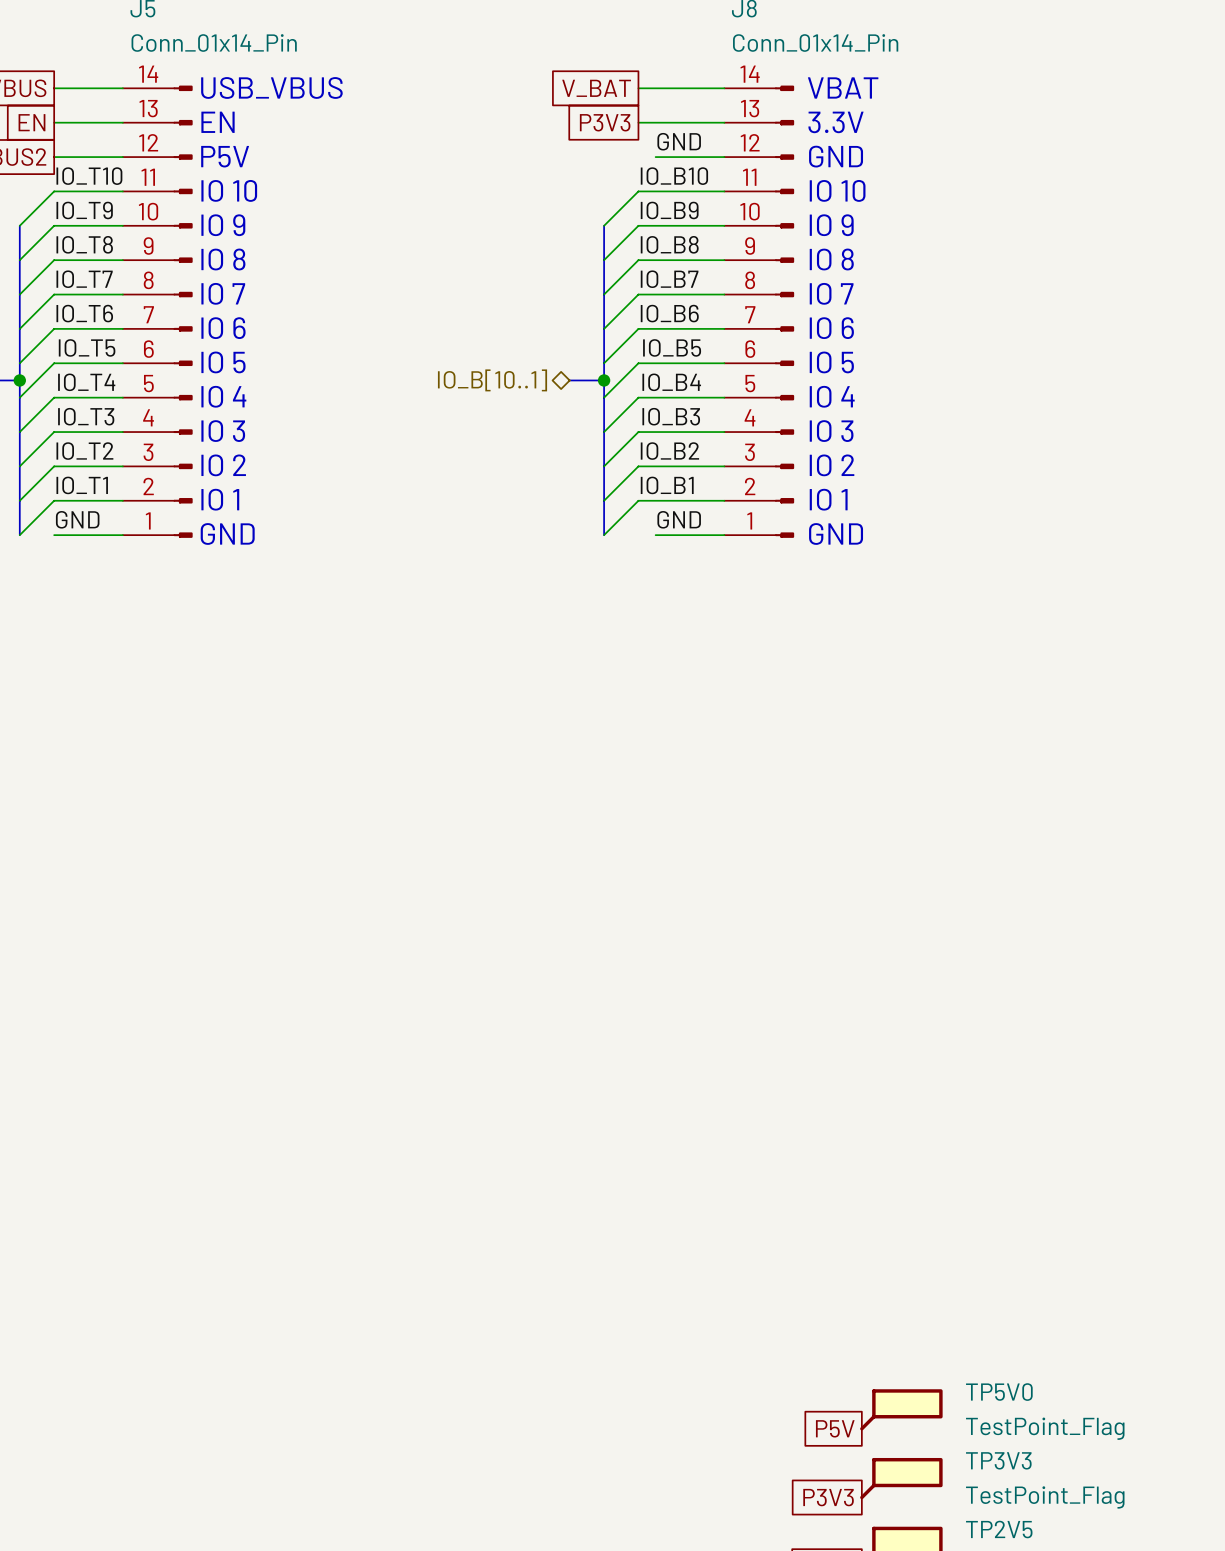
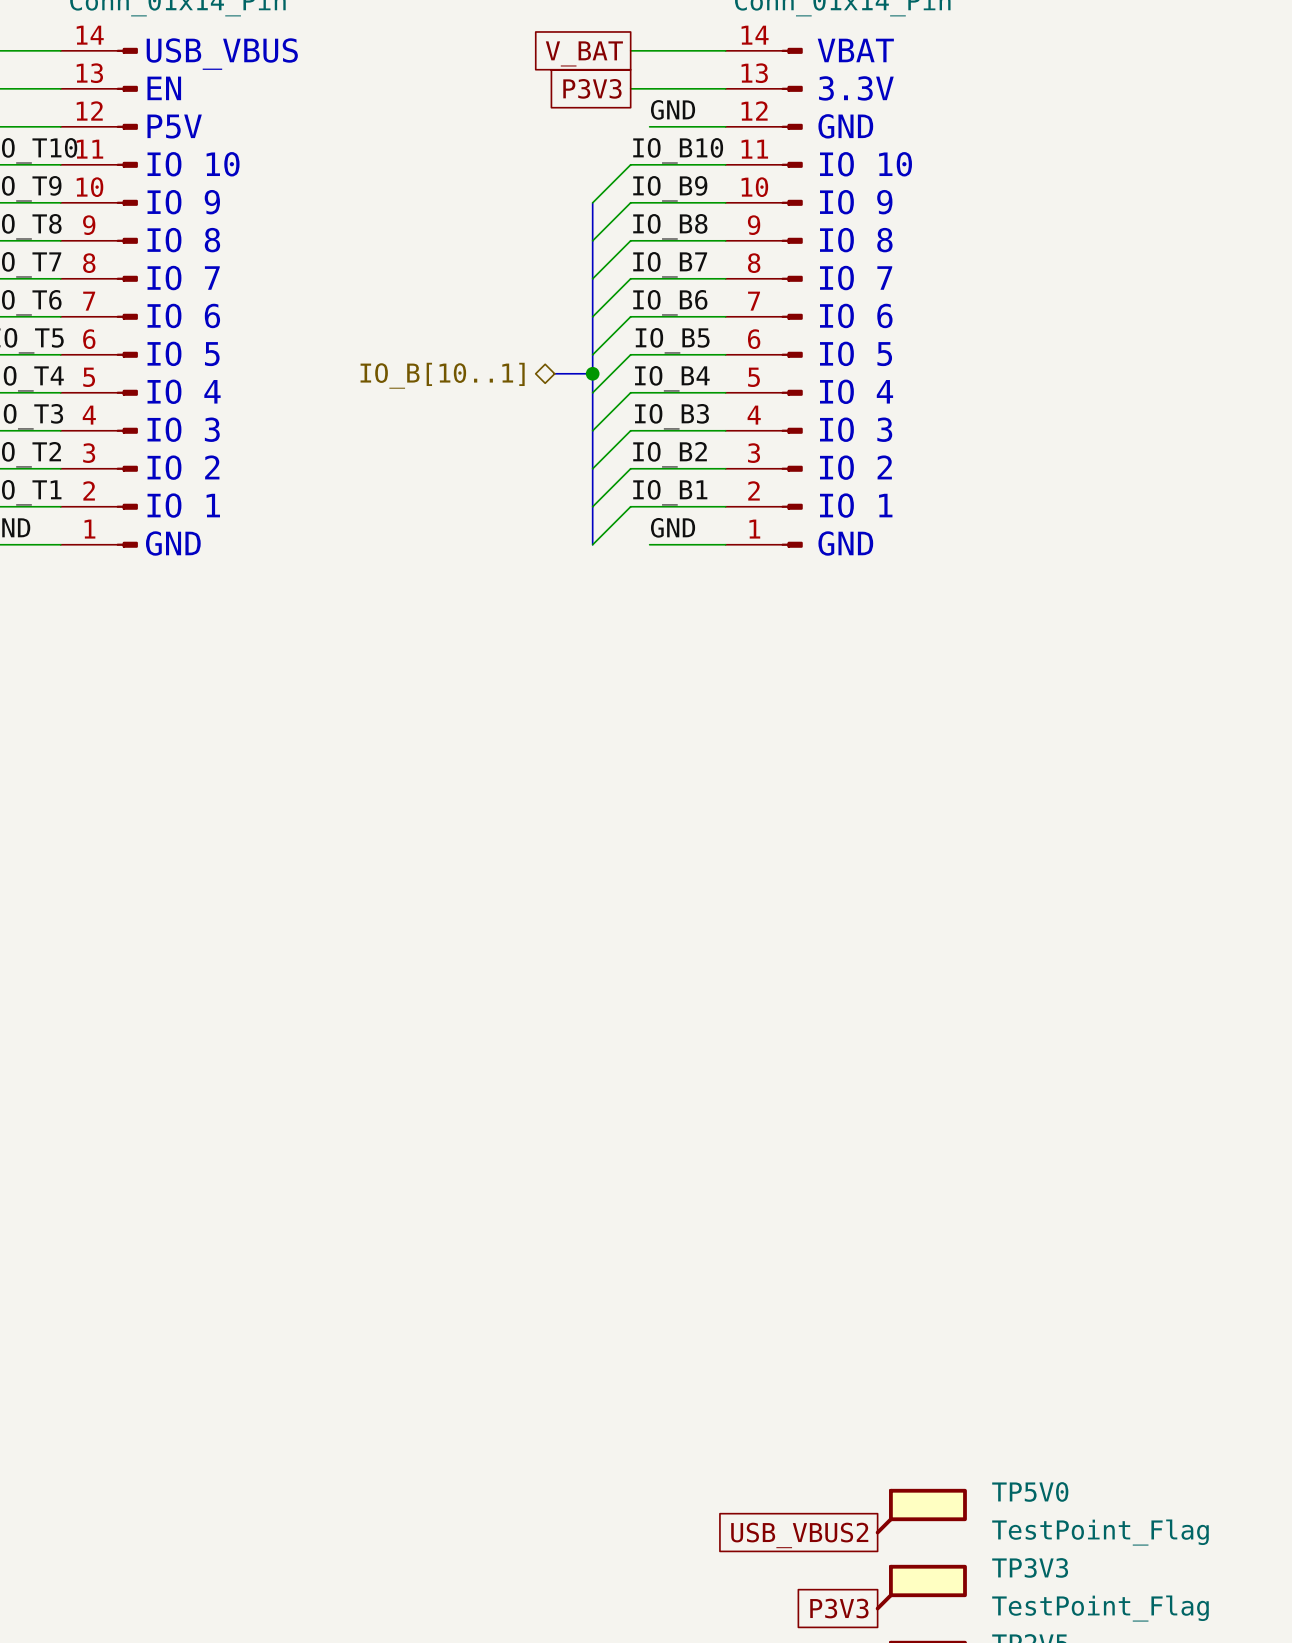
global label: P5V (835, 1428) -> USB_VBUS2 (799, 1535)

